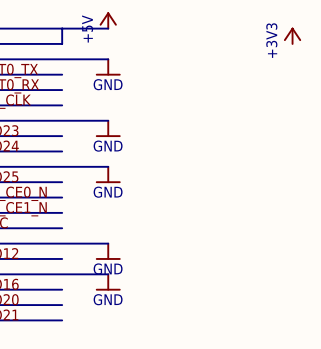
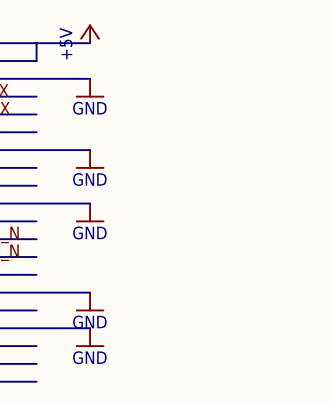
power symbol: +3V3 (292, 35) -> none

